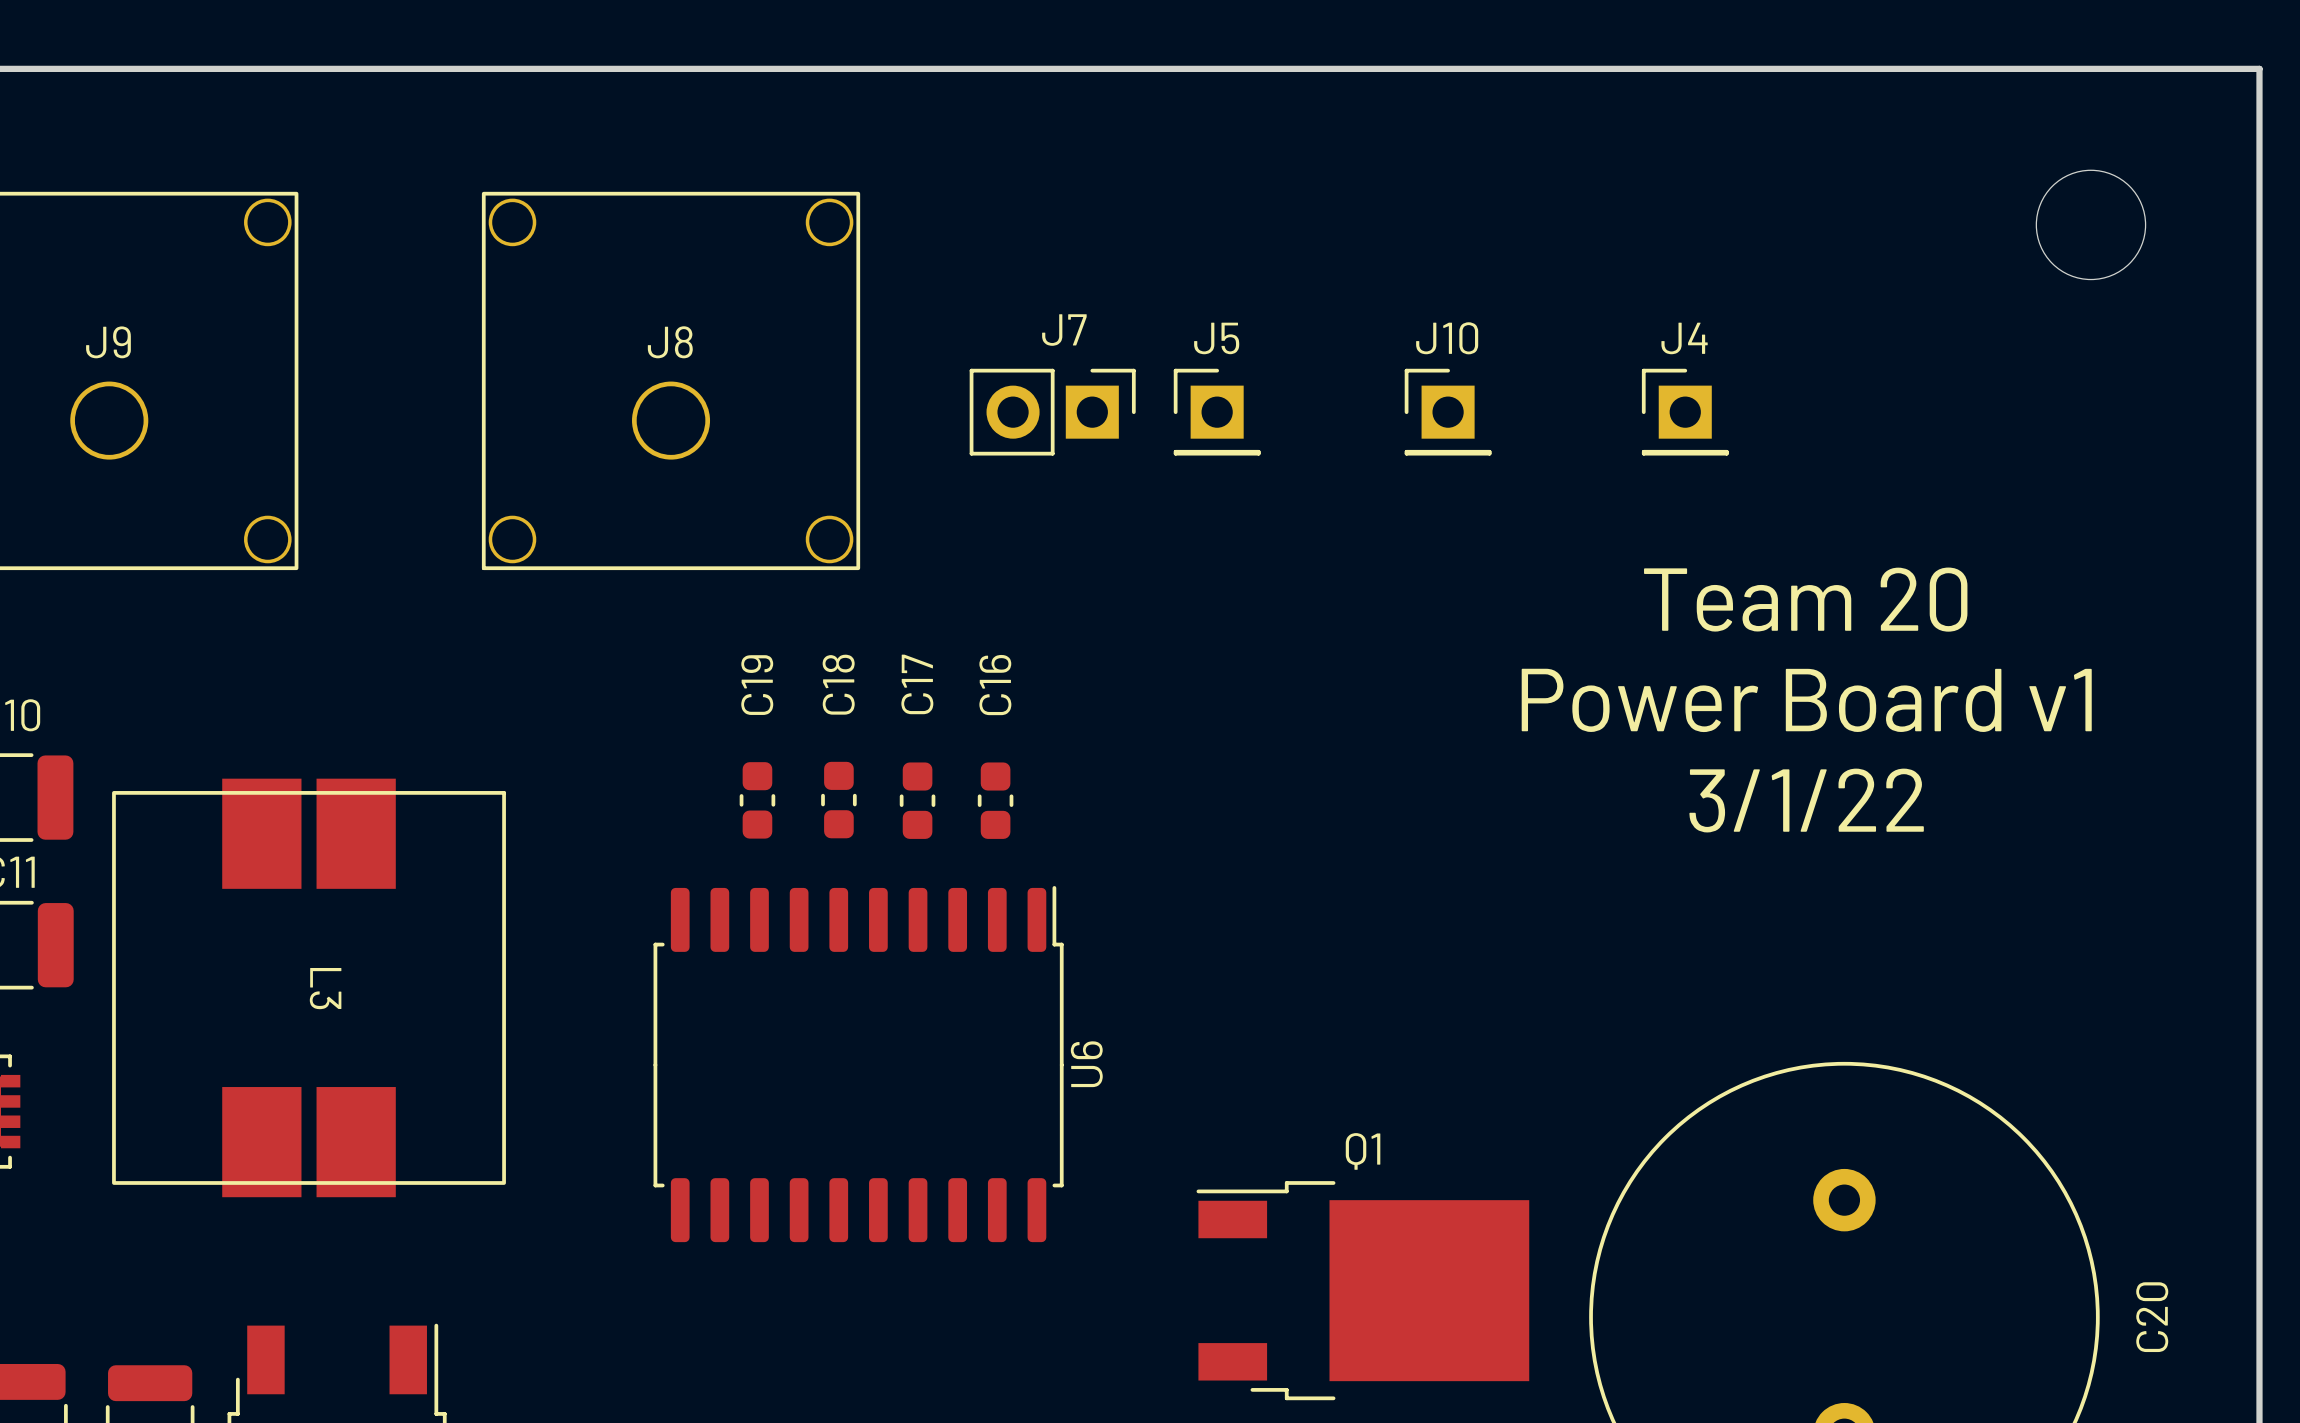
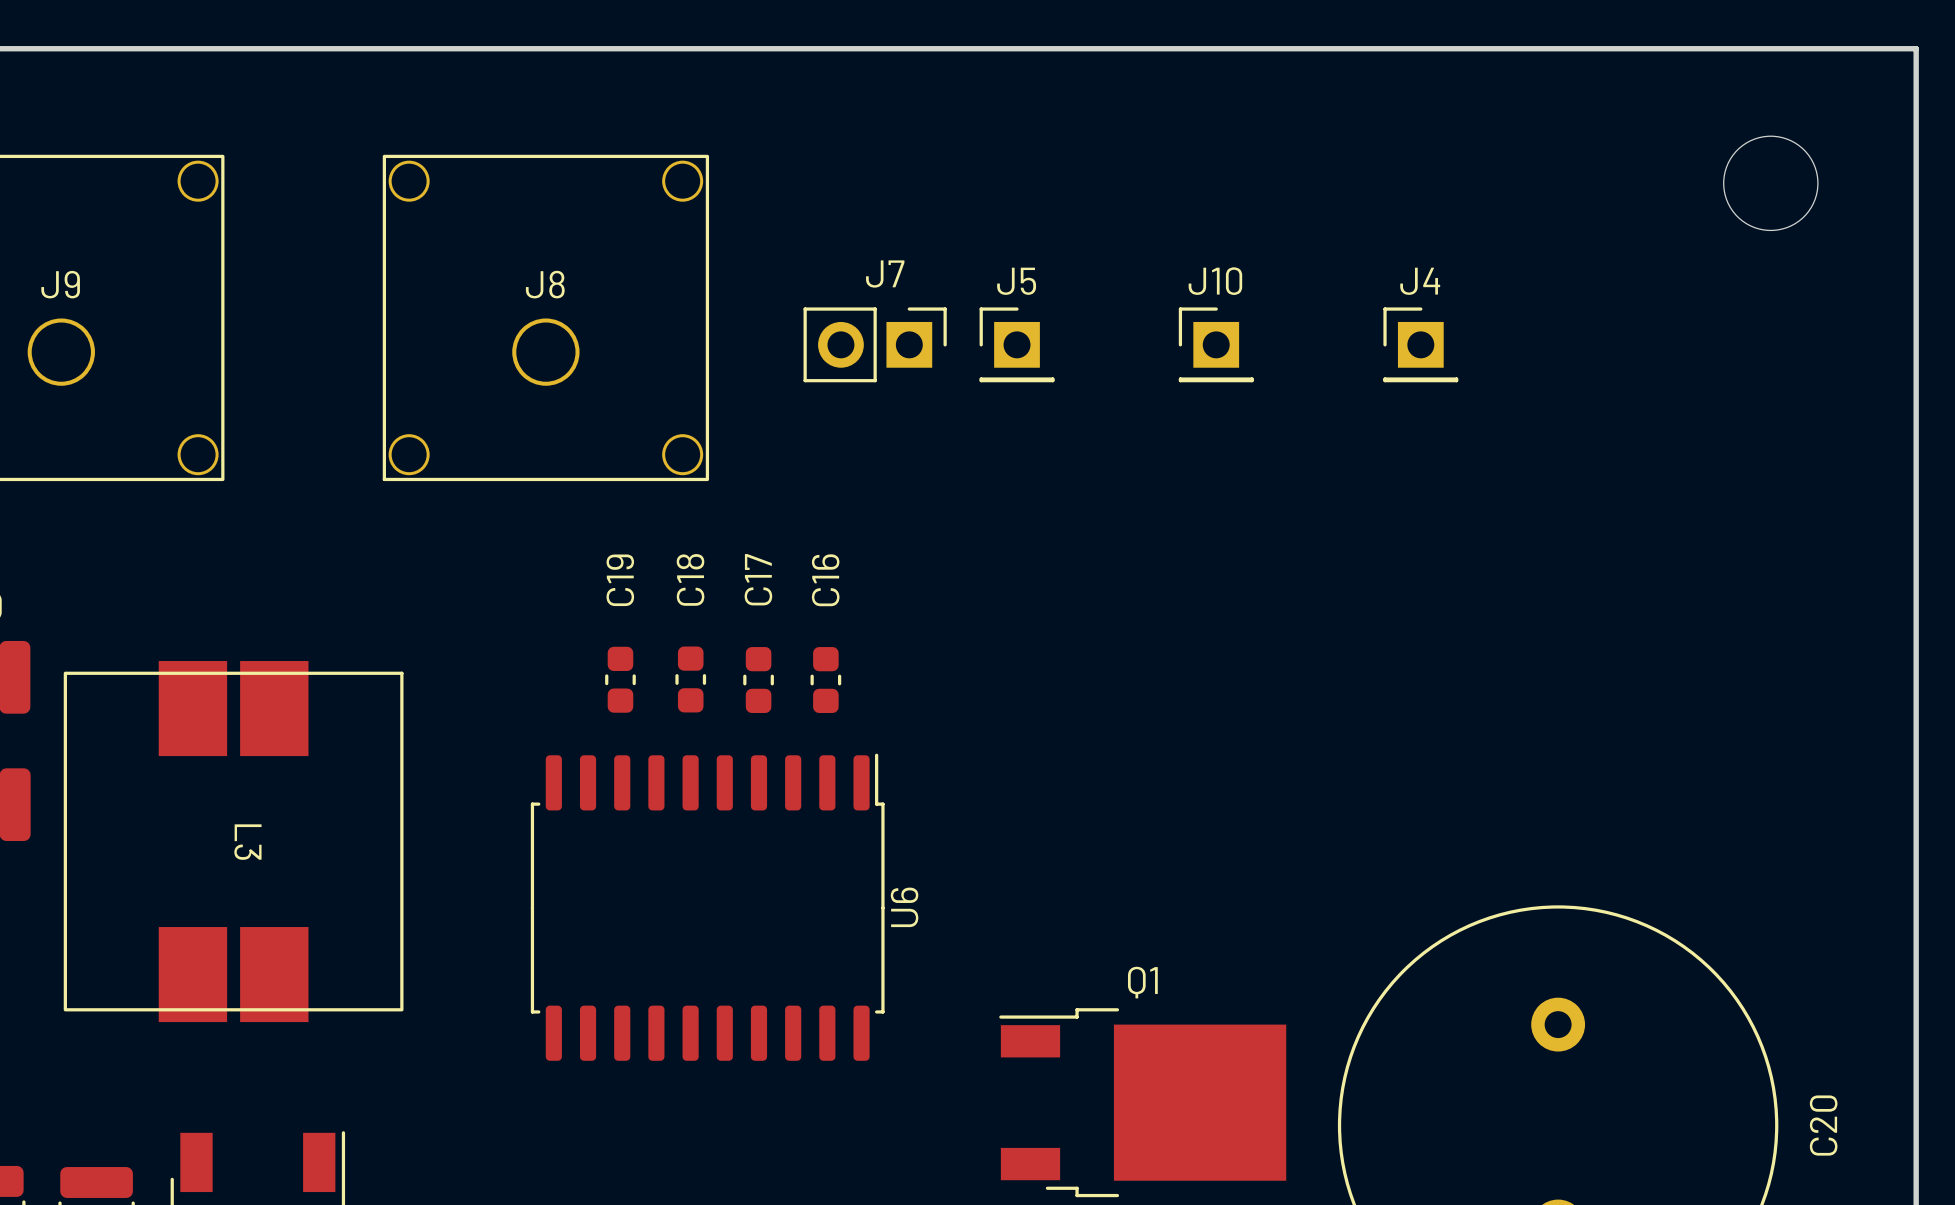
text: Team 20 (1805, 599) -> none
text: Power Board v1 (1806, 700) -> none
text: 3/1/22 (1806, 800) -> none

